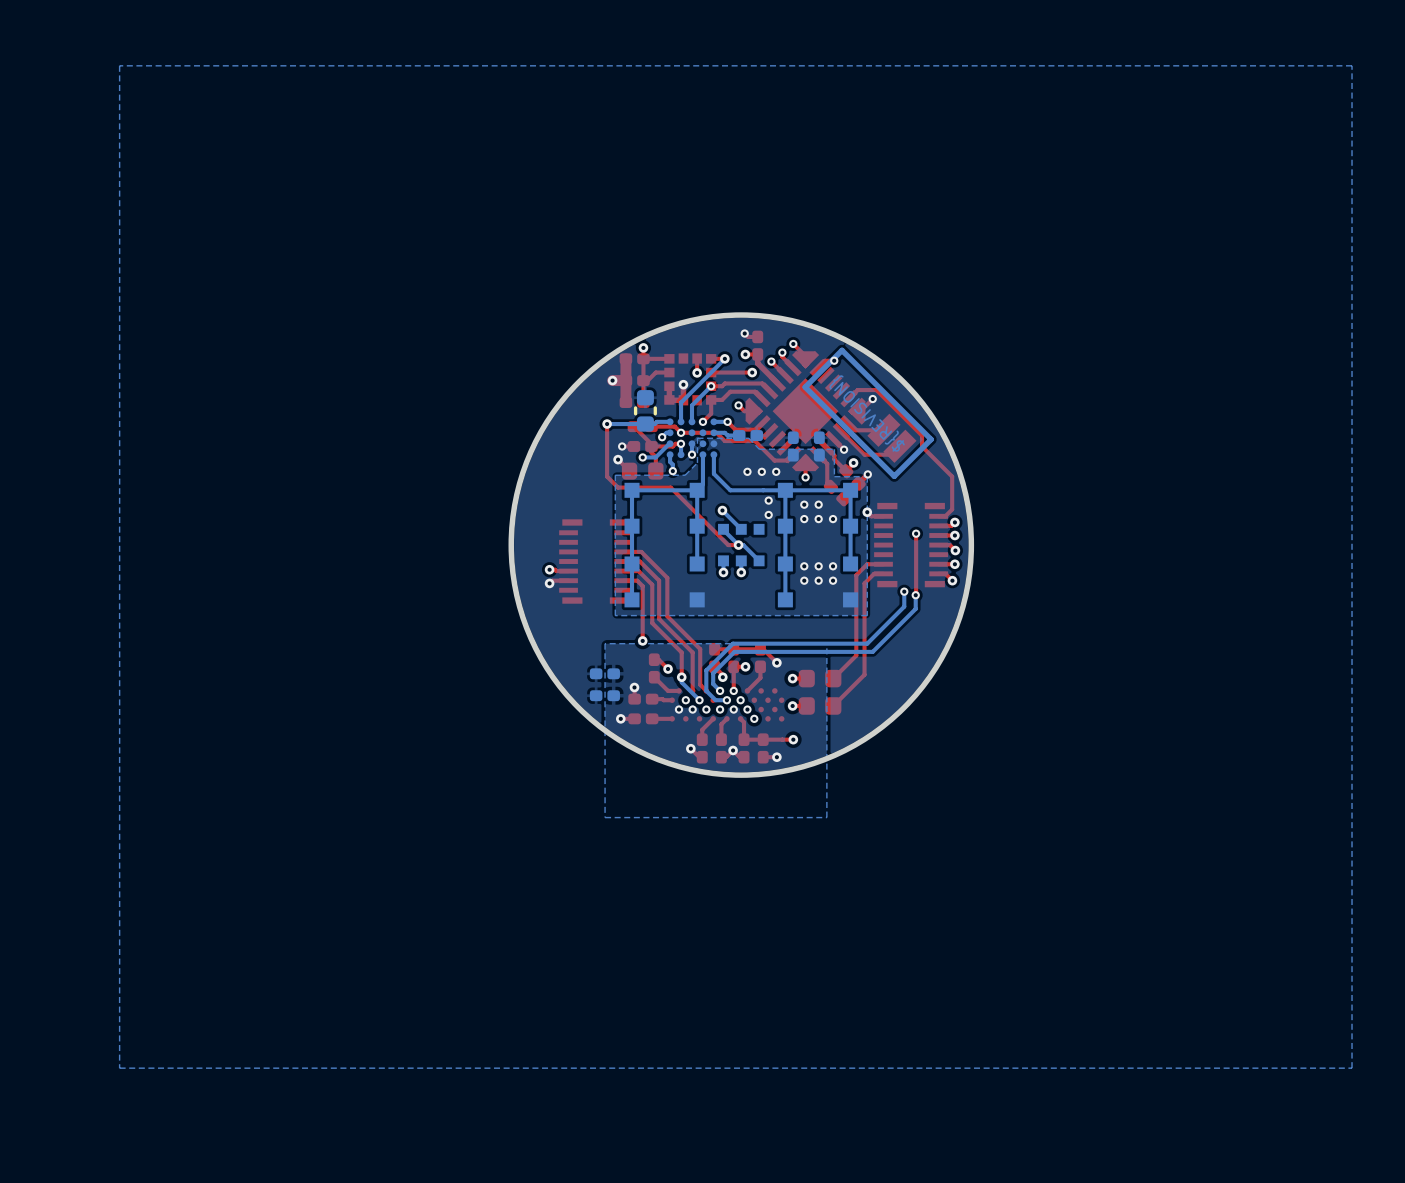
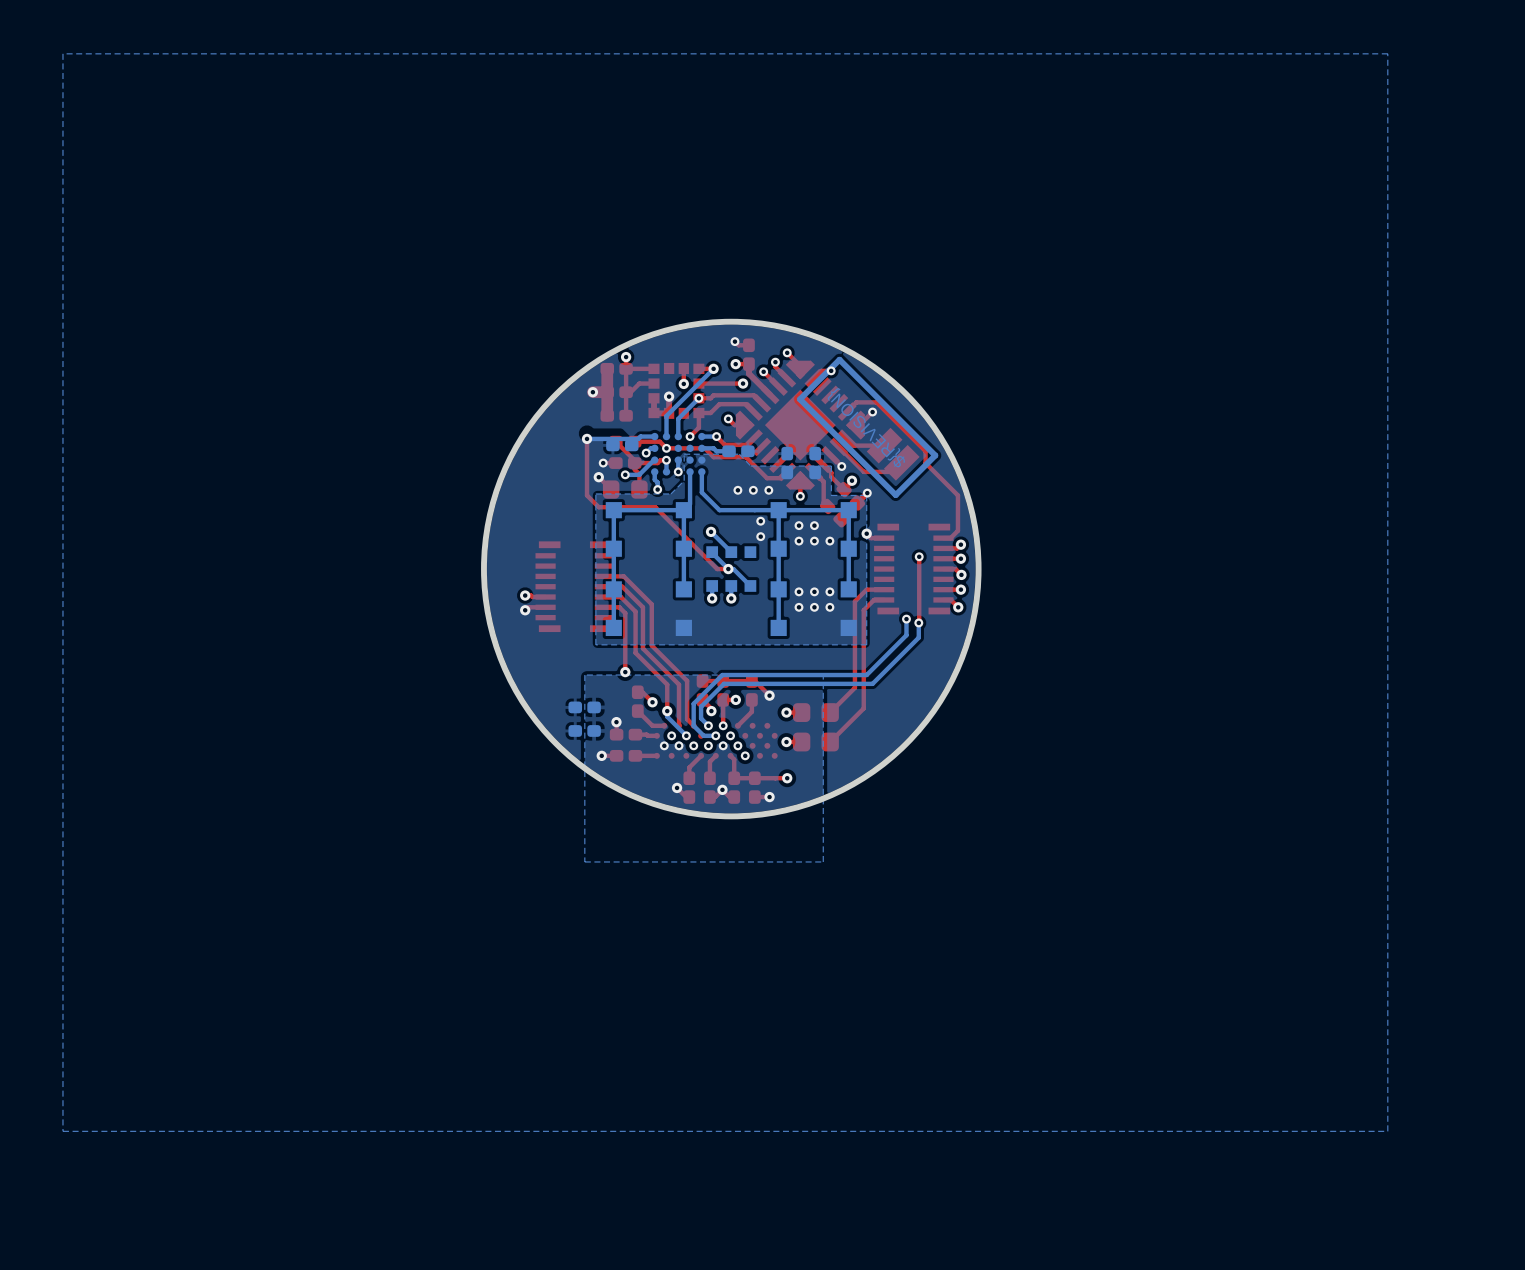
part footprint: [633, 390, 657, 432] -> [606, 439, 639, 452]

